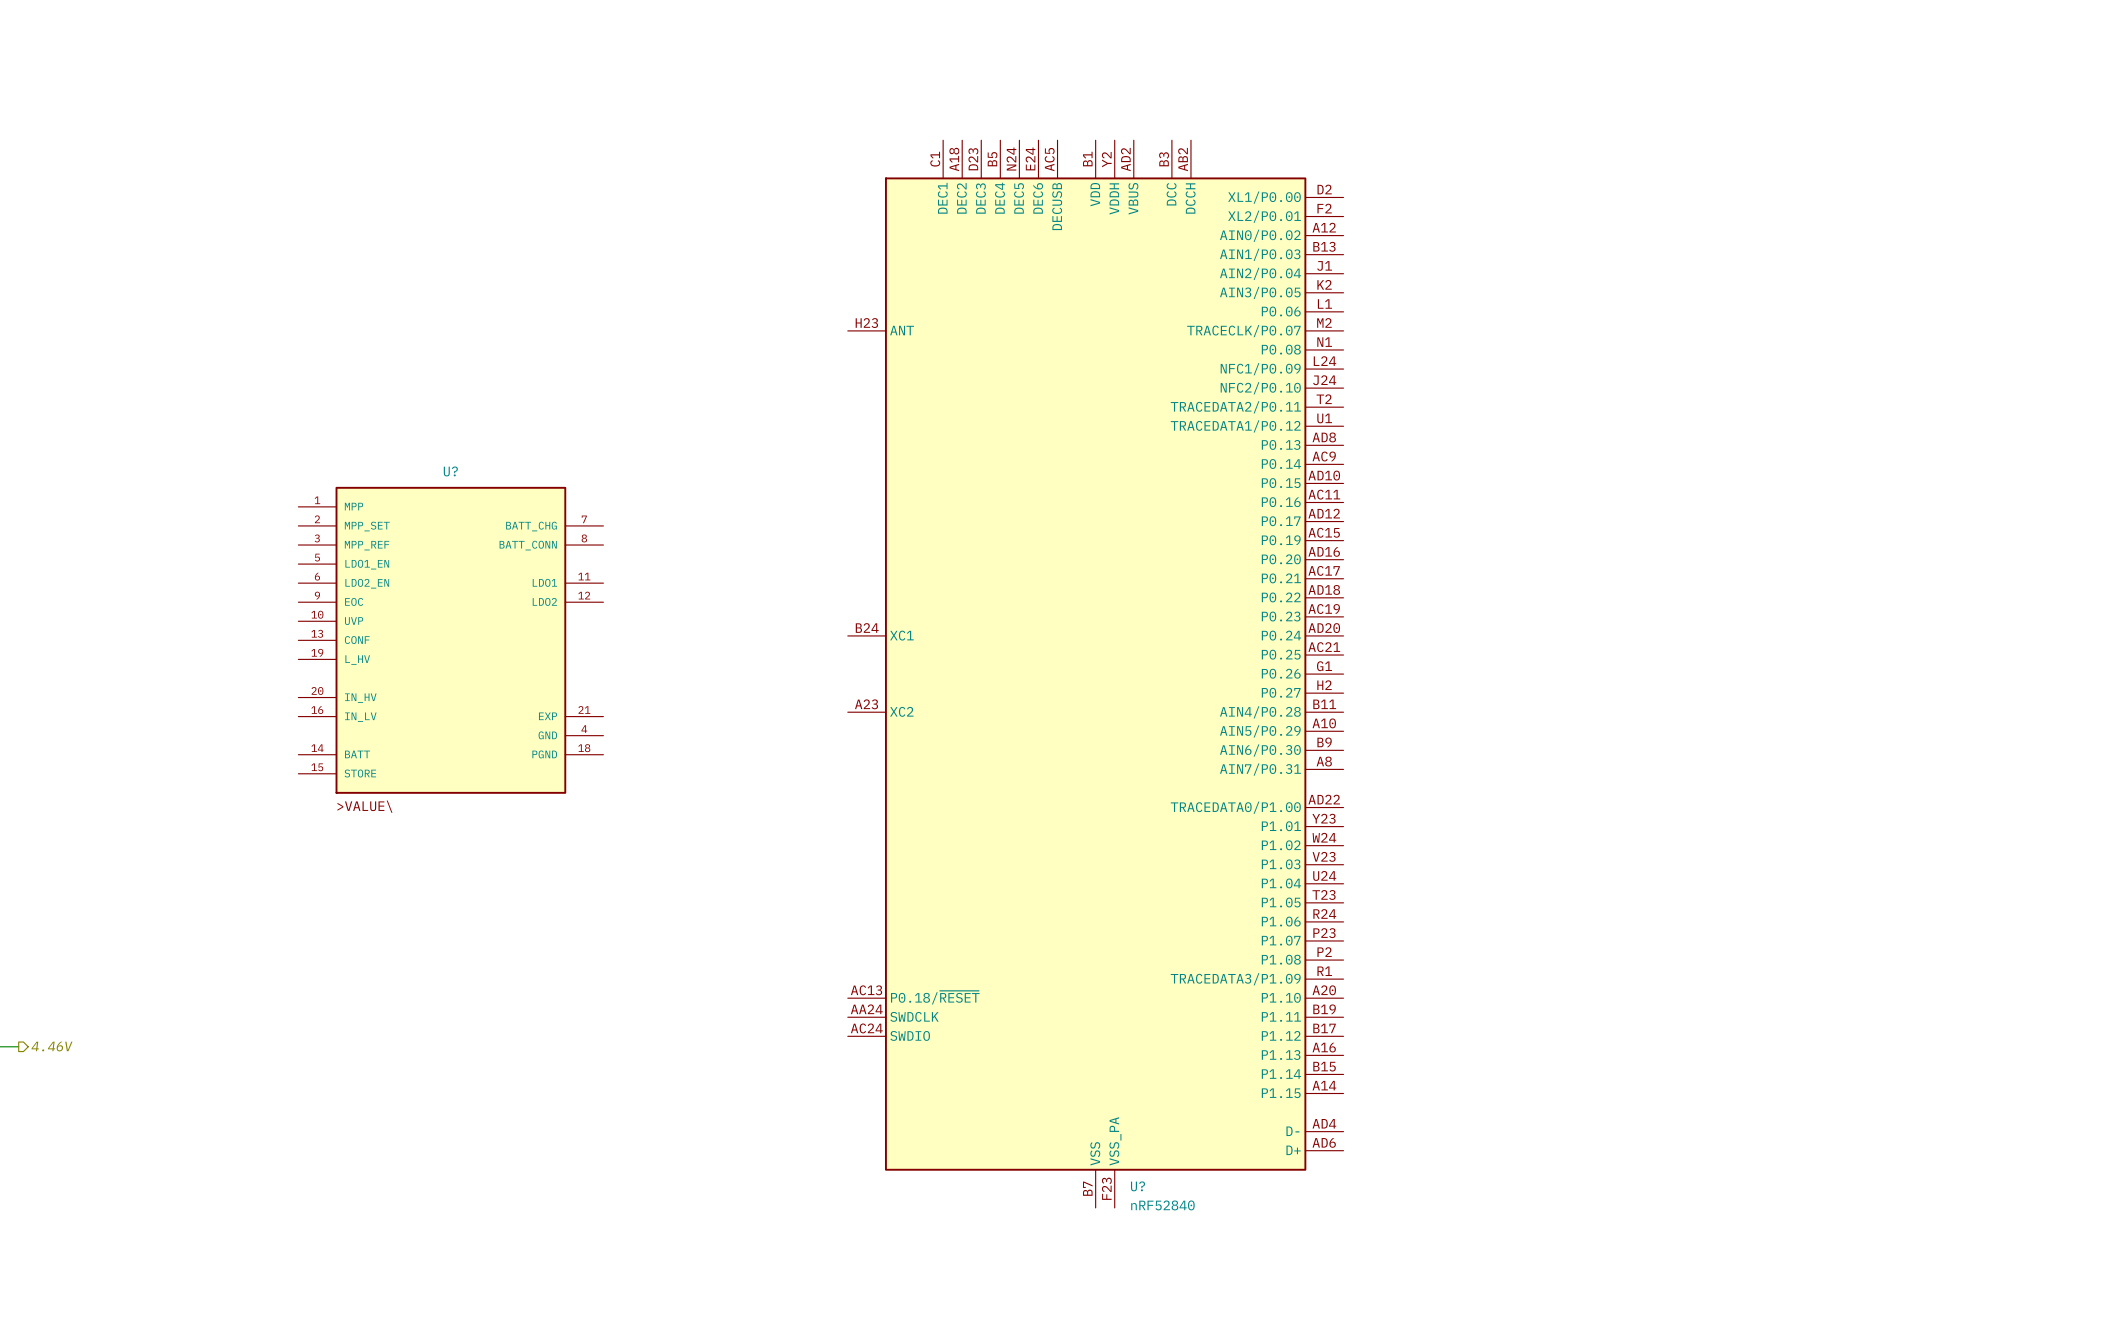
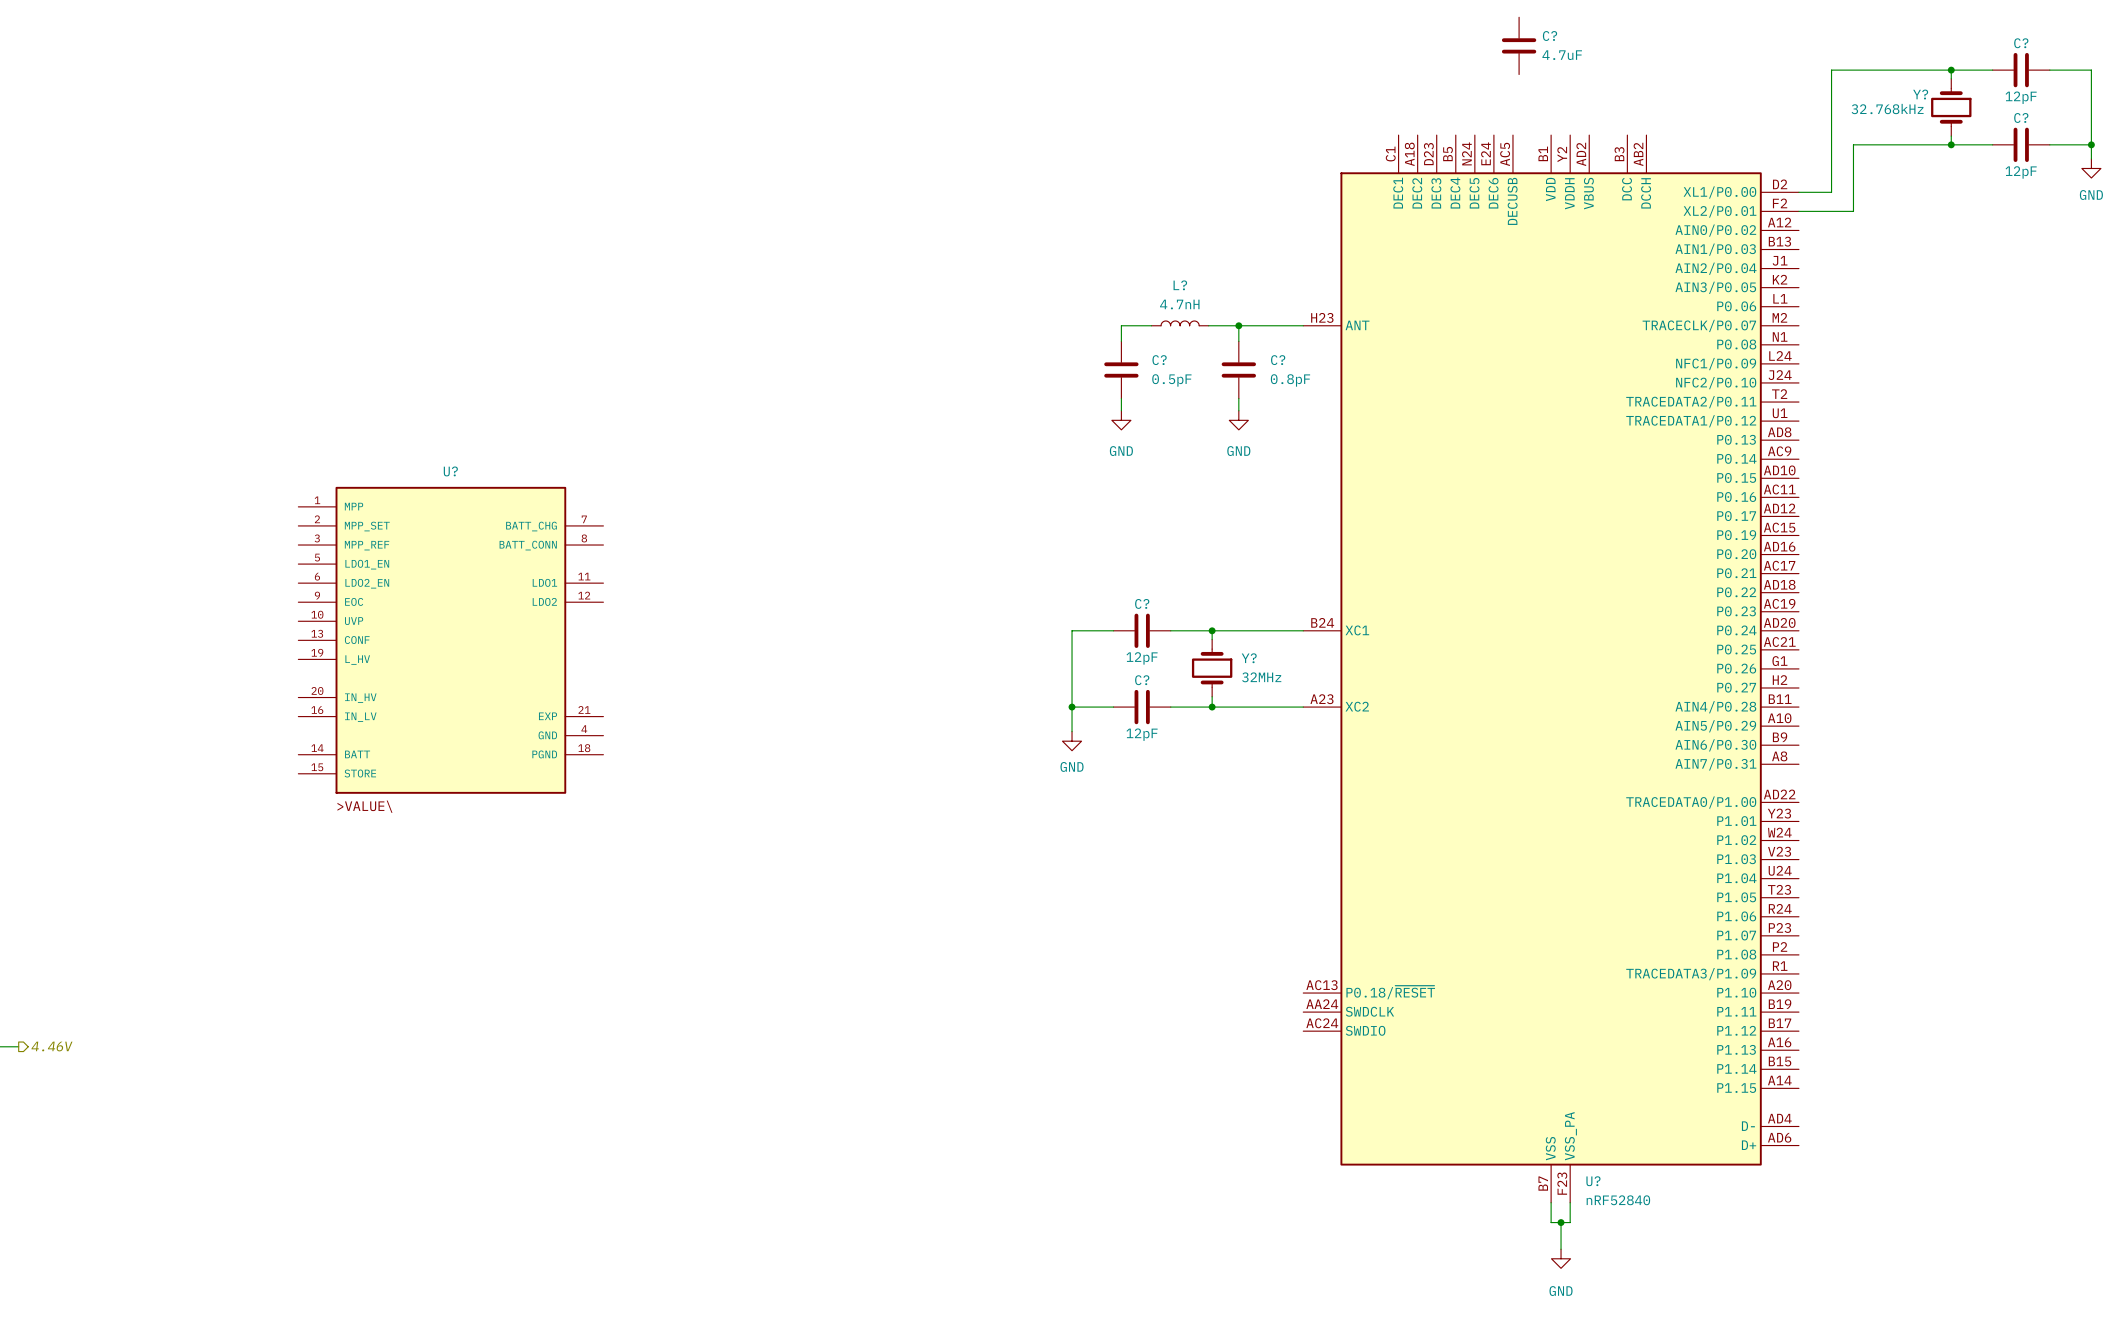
C?: none -> 4.7uF (1519, 45)
wire: none -> (1951, 70) (1951, 78)
junction: none -> (1951, 70)
wire: none -> (1992, 70) (1831, 70) (1831, 192) (1798, 192)
C?: none -> 12pF (2021, 70)
wire: none -> (2049, 70) (2091, 70) (2091, 158)
Y?: none -> 32.768kHz (1951, 107)
wire: none -> (1951, 136) (1951, 144)
junction: none -> (1951, 144)
wire: none -> (1992, 144) (1853, 144) (1853, 211) (1798, 211)
C?: none -> 12pF (2021, 144)
wire: none -> (2049, 144) (2091, 144)
junction: none -> (2091, 144)
power symbol: none -> GND (2091, 168)
L?: none -> 4.7nH (1180, 323)
junction: none -> (1238, 325)
C?: none -> 0.5pF (1121, 370)
C?: none -> 0.8pF (1238, 370)
power symbol: none -> GND (1121, 420)
power symbol: none -> GND (1238, 420)
C?: none -> 12pF (1142, 630)
junction: none -> (1212, 630)
Y?: none -> 32MHz (1212, 668)
U?: none -> nRF52840 (1551, 668)
U?: nRF52840 (1095, 674) -> none
junction: none -> (1072, 707)
C?: none -> 12pF (1142, 707)
junction: none -> (1212, 707)
power symbol: none -> GND (1072, 741)
wire: none -> (1551, 1202) (1551, 1222) (1570, 1222) (1570, 1202)
wire: none -> (1561, 1222) (1561, 1249)
junction: none -> (1561, 1222)
power symbol: none -> GND (1561, 1258)

